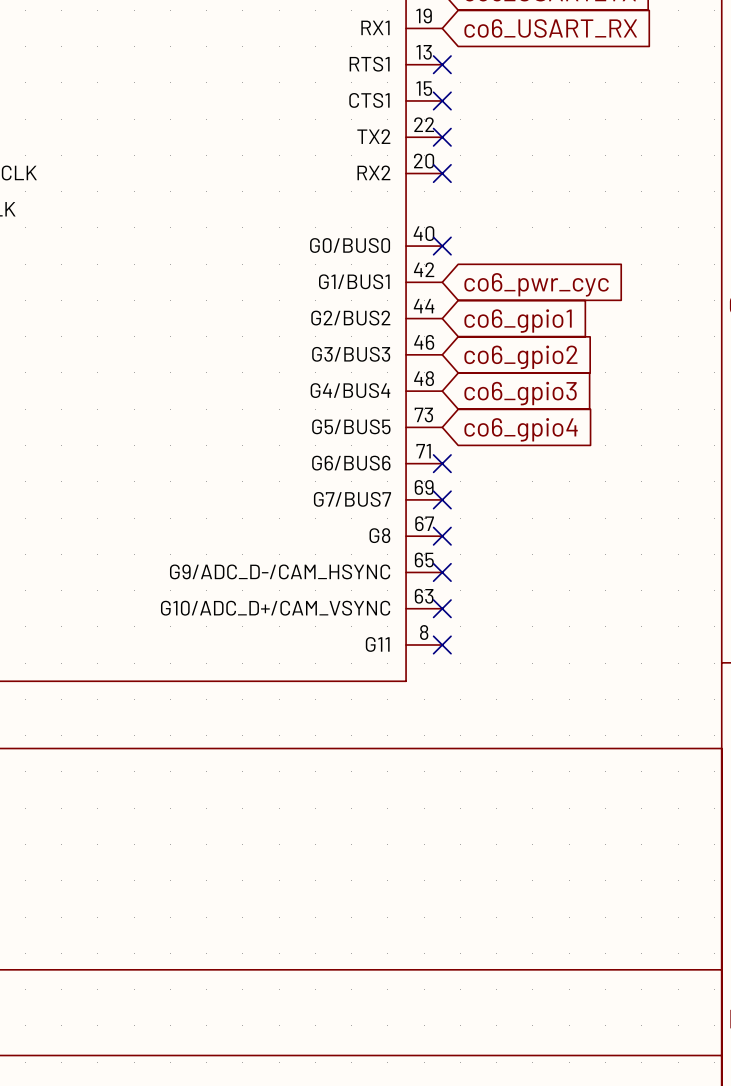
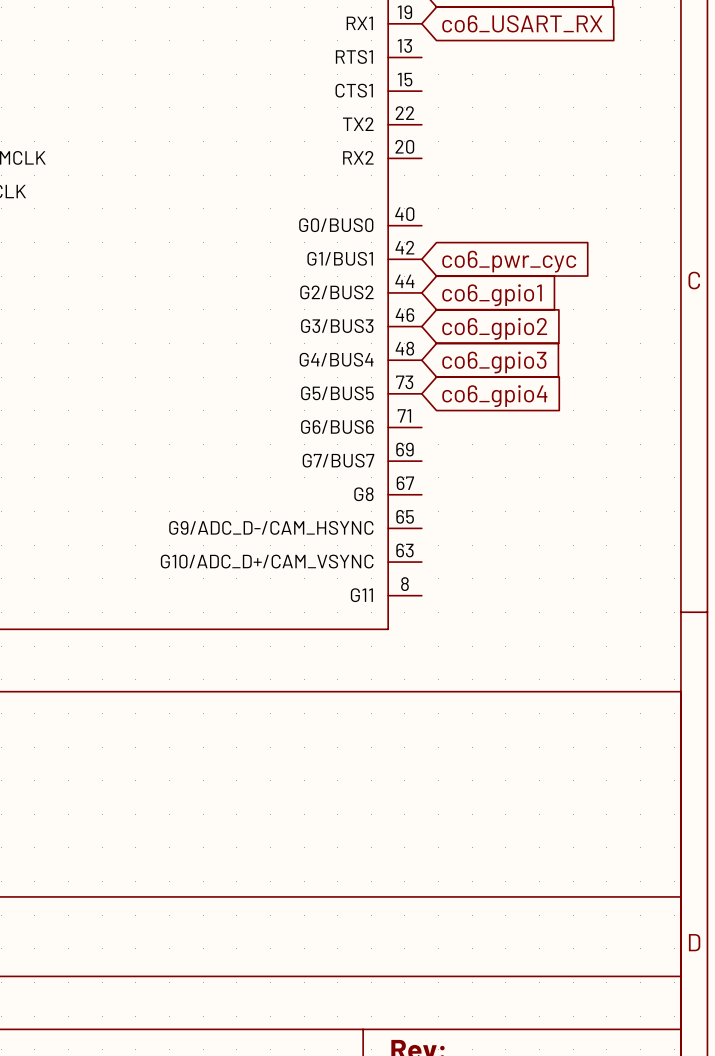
no-connect mark: (442, 64) -> none
no-connect mark: (442, 100) -> none
no-connect mark: (442, 137) -> none
no-connect mark: (442, 173) -> none
no-connect mark: (442, 246) -> none
no-connect mark: (442, 463) -> none
no-connect mark: (442, 499) -> none
no-connect mark: (442, 536) -> none
no-connect mark: (442, 572) -> none
no-connect mark: (442, 608) -> none
no-connect mark: (442, 644) -> none

